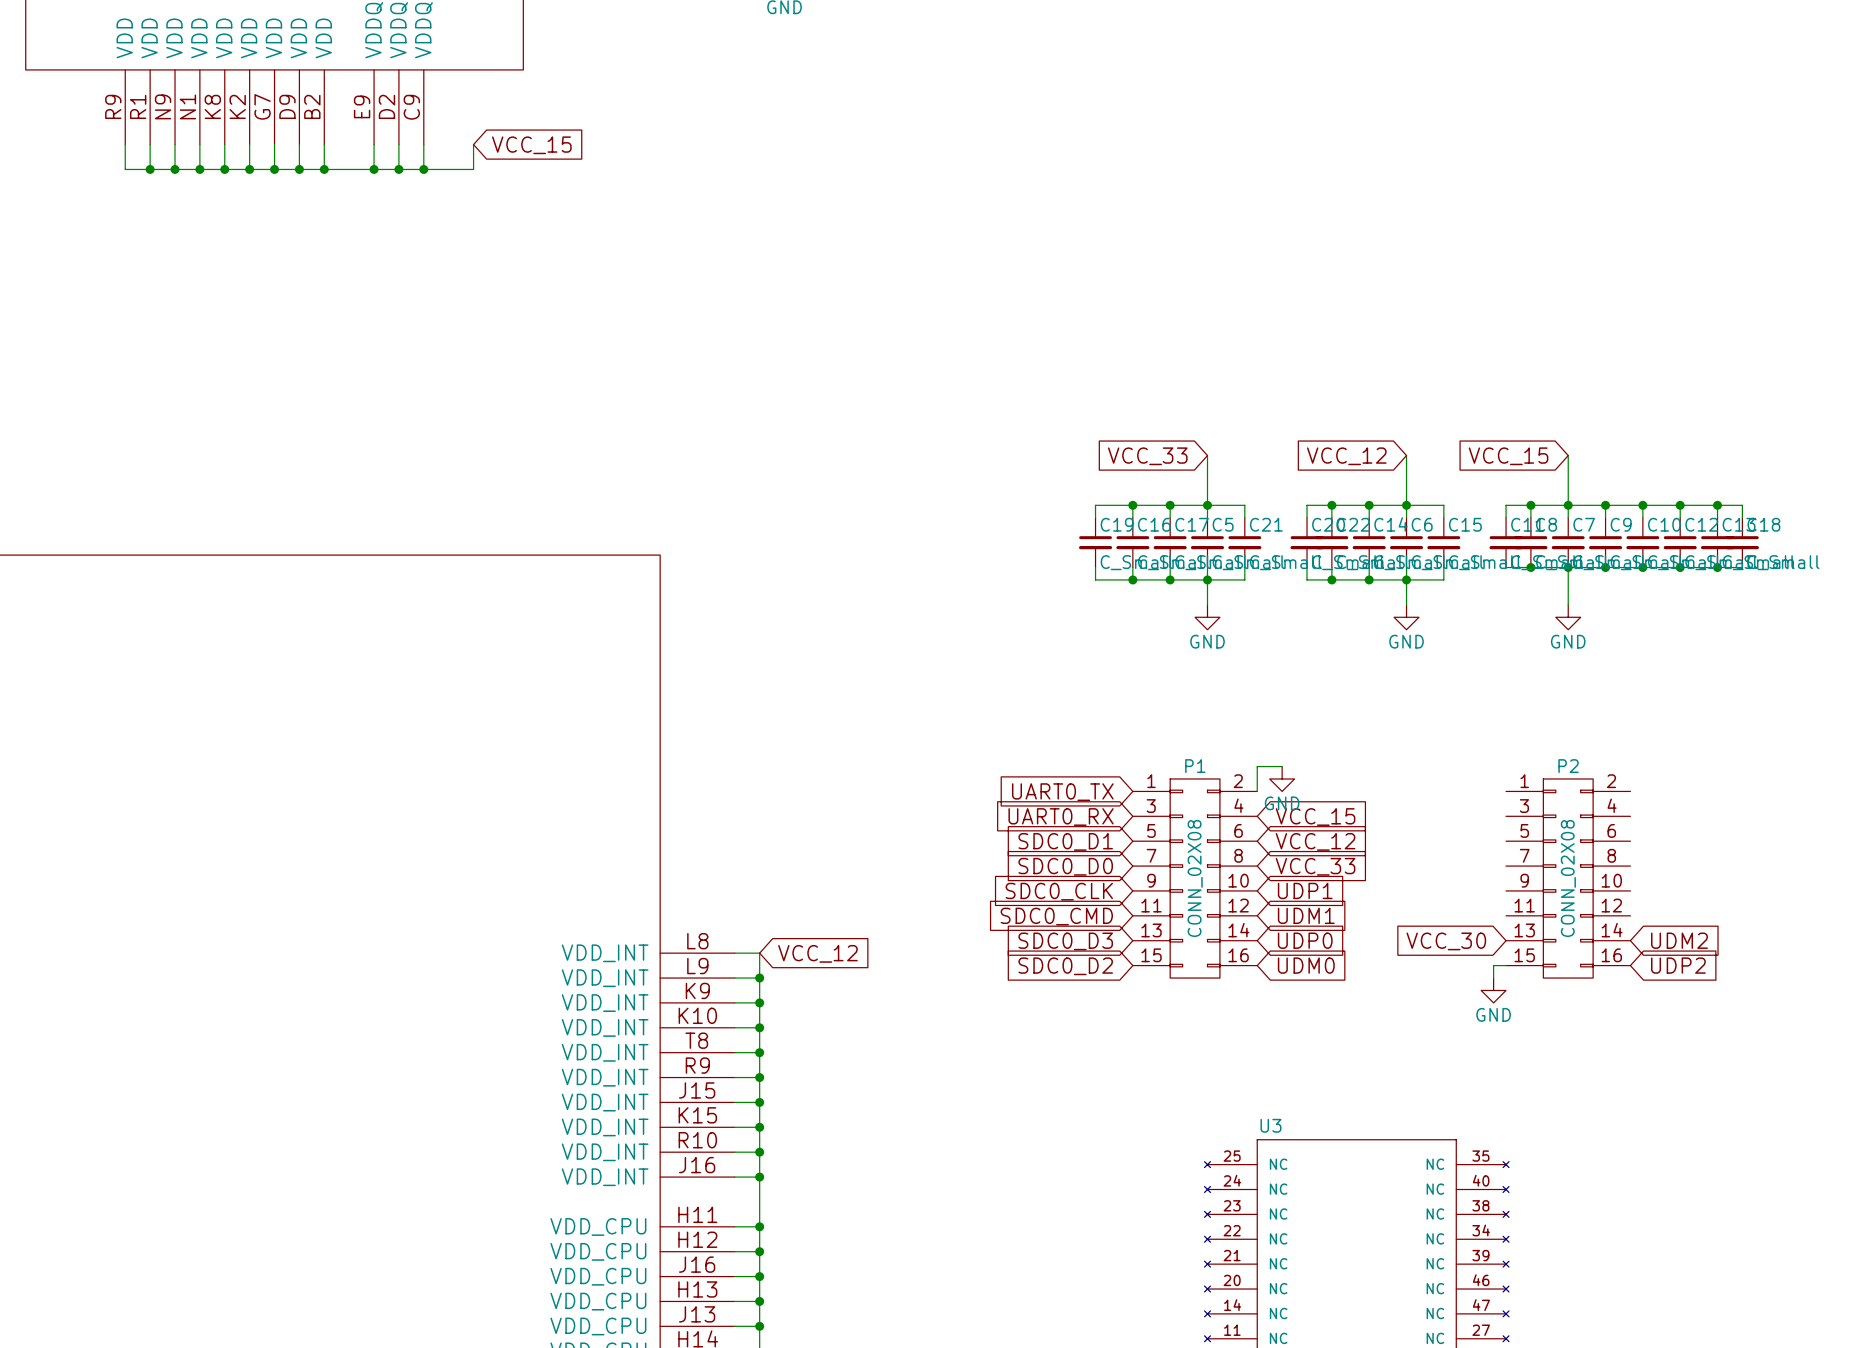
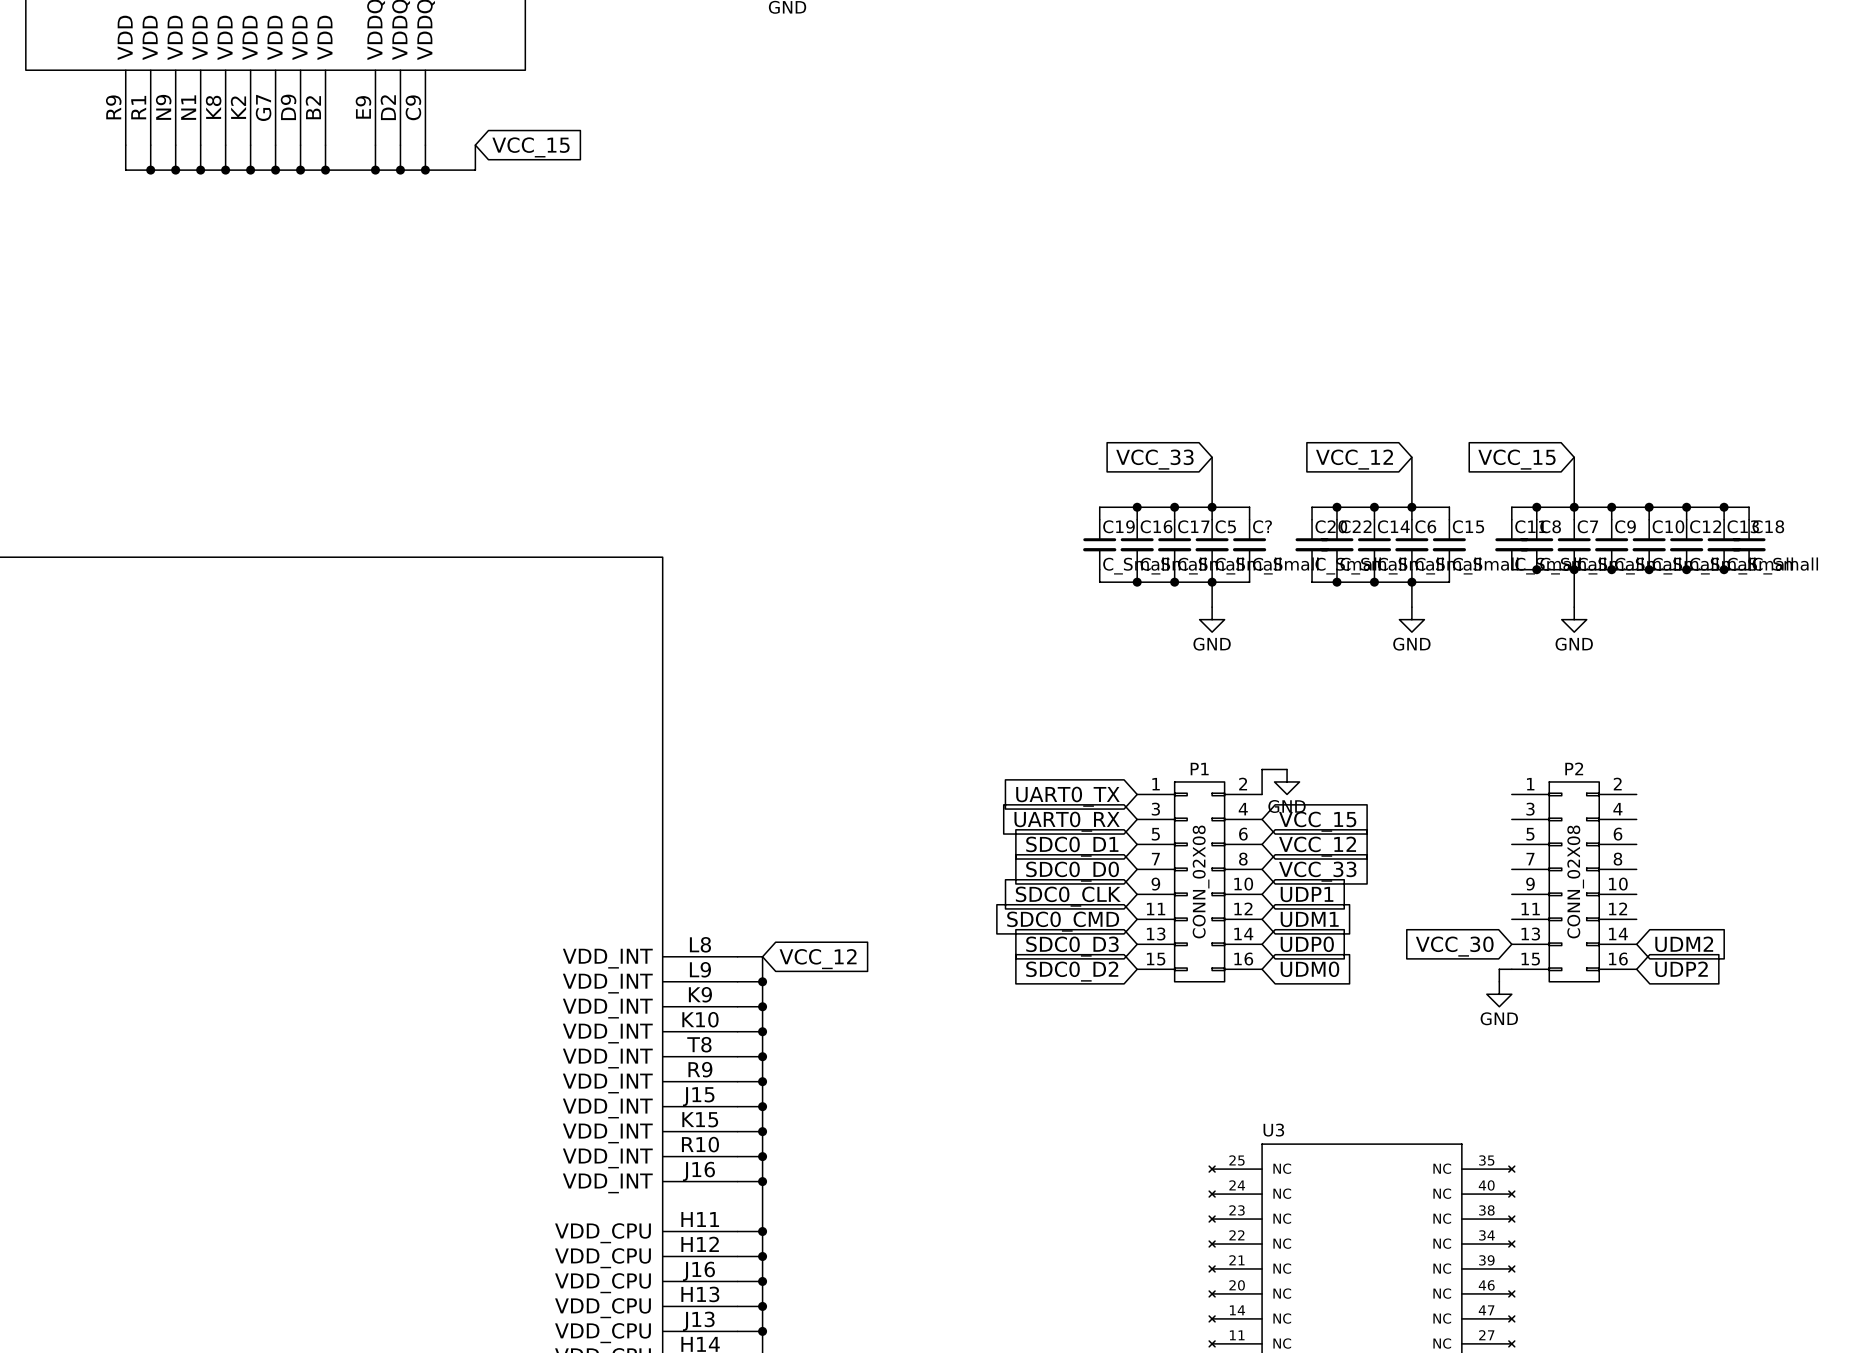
C21 name: C21 (1266, 524) -> C? (1262, 526)

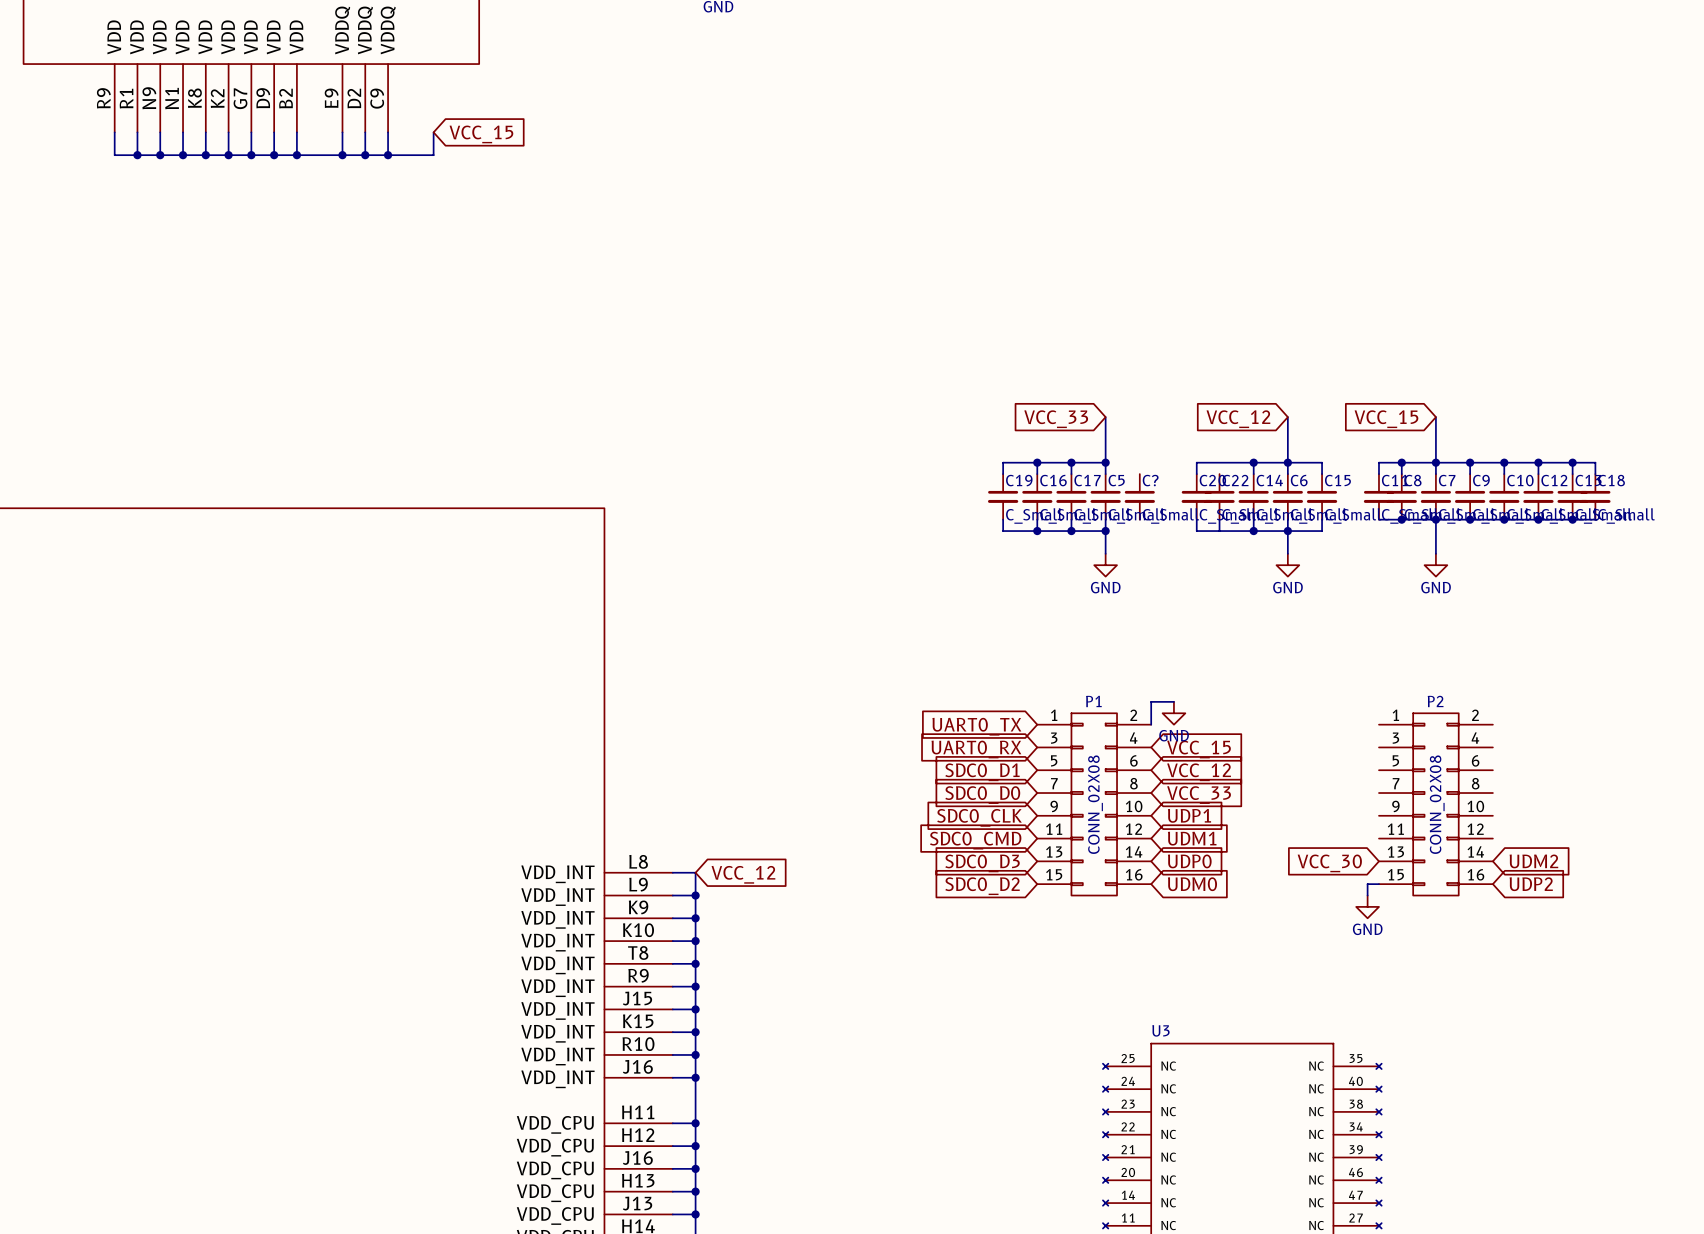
wire: (1212, 507) (1249, 507) (1249, 519) -> none
wire: (1336, 507) (1336, 519) -> none
junction: (1336, 507) -> none
wire: (1249, 569) (1249, 582) (1212, 582) -> none
junction: (1336, 582) -> none

